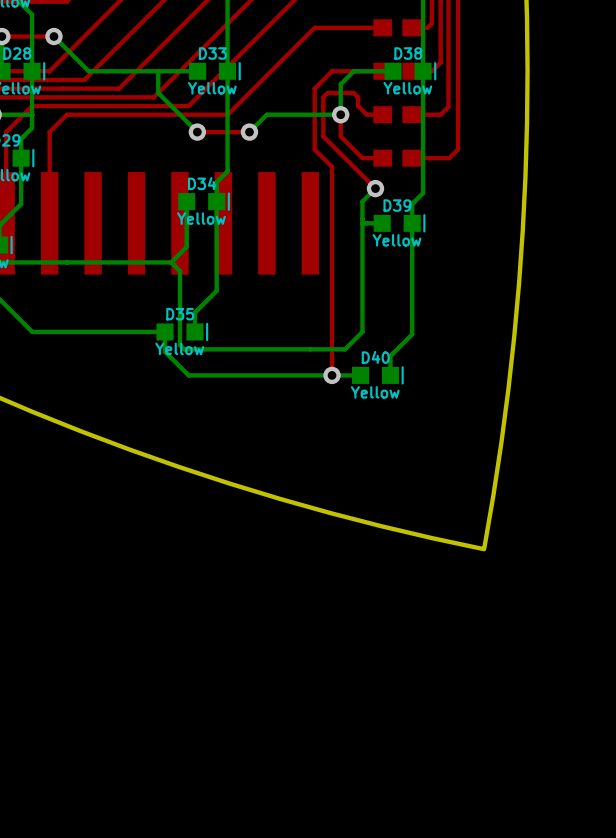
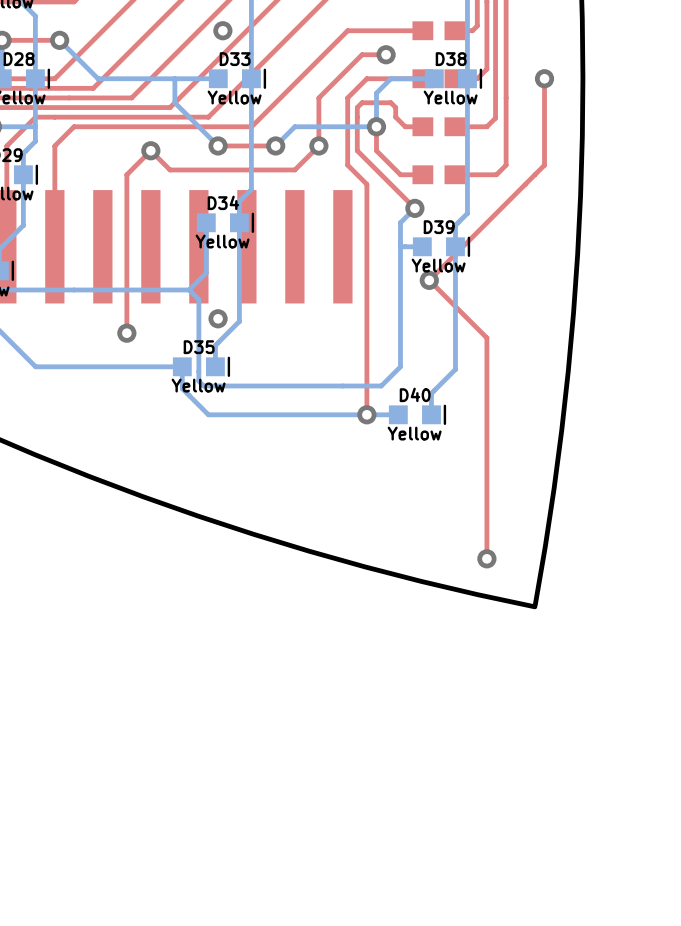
via: none -> (222, 30)
top track: none -> (386, 54) (362, 54) (318, 97) (318, 145) (294, 169) (170, 169) (150, 150) (126, 174) (126, 333)
via: none -> (386, 54)
top track: none -> (544, 78) (544, 165) (429, 280) (486, 337) (486, 558)
via: none -> (544, 78)
via: none -> (318, 145)
via: none -> (150, 150)
via: none -> (429, 280)
via: none -> (218, 318)
via: none -> (126, 333)
via: none -> (486, 558)

